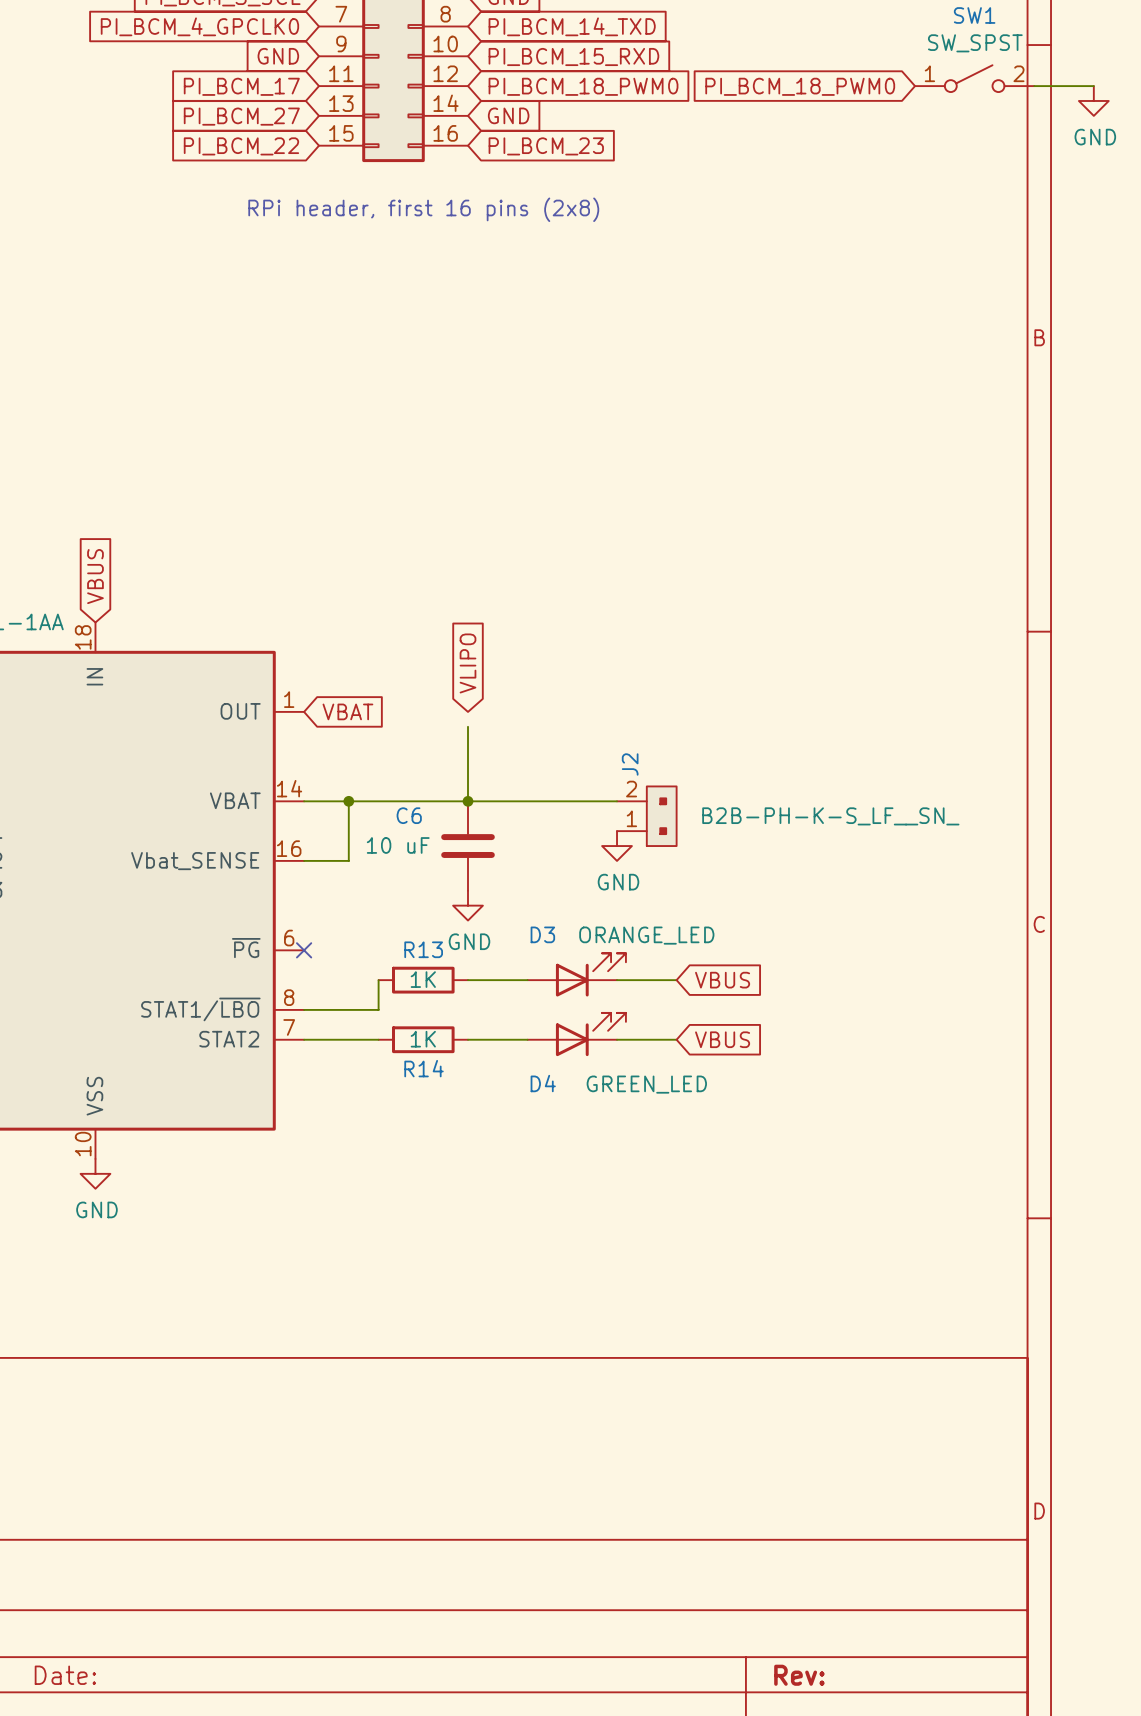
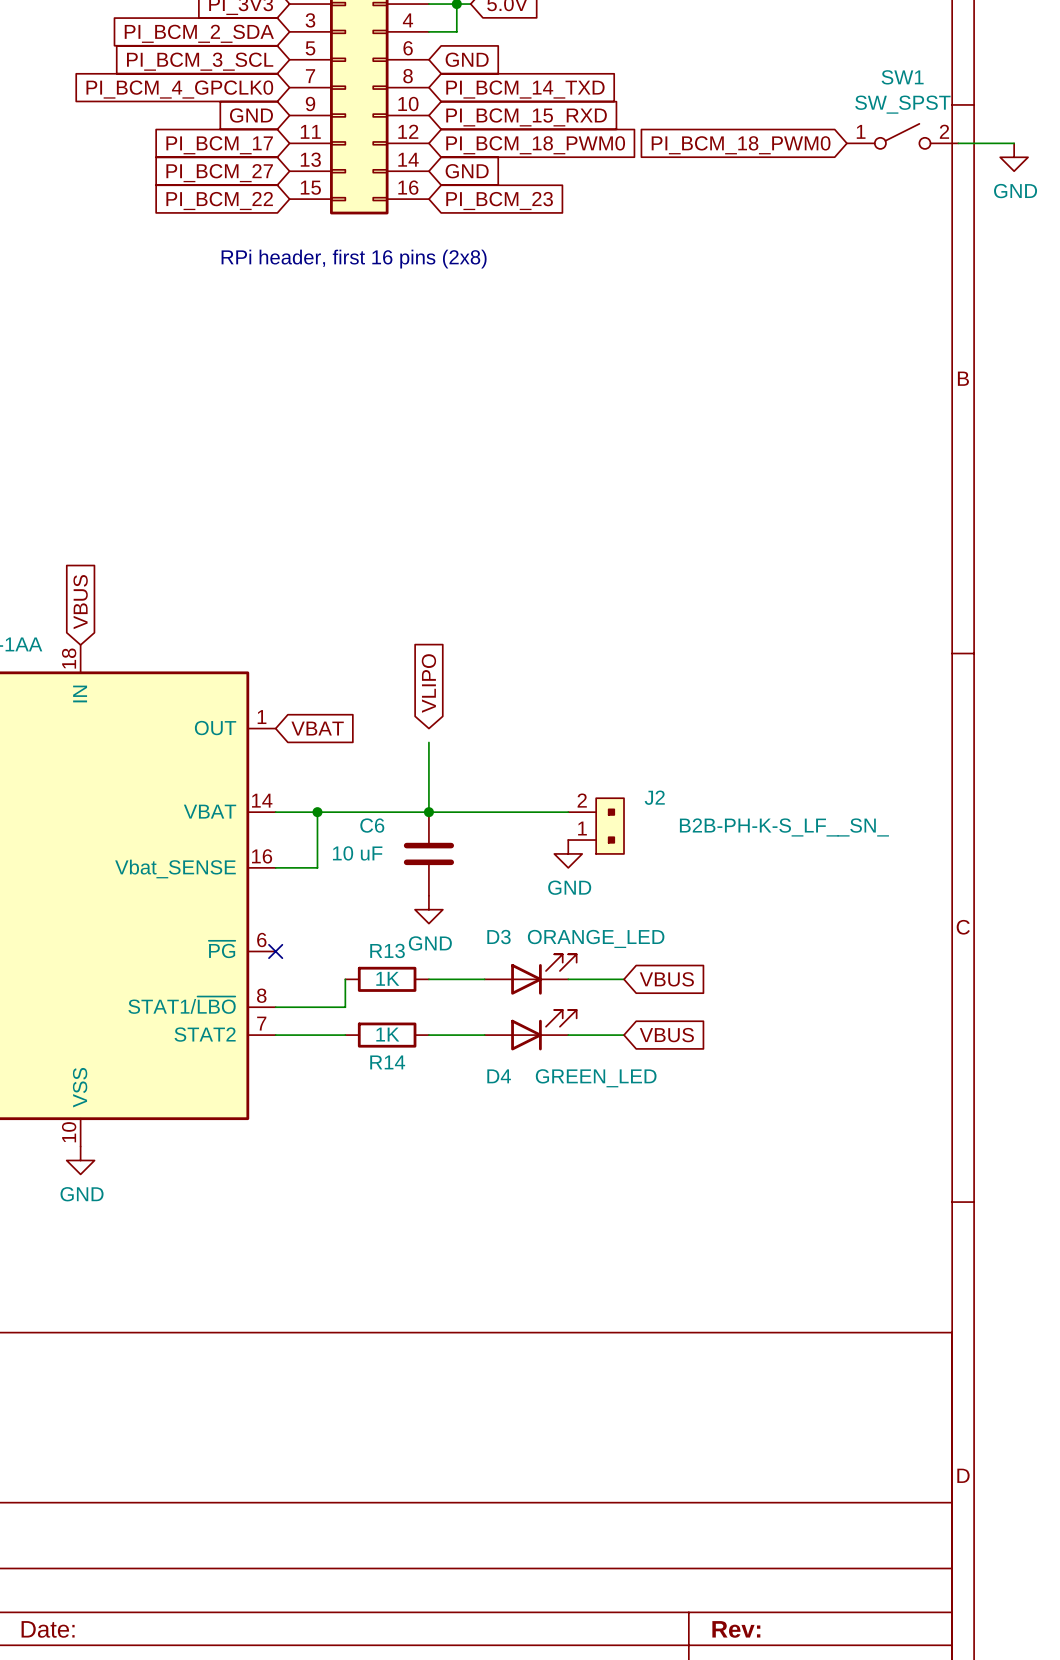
J2 name rotation: 0° (630, 764) -> 90° clockwise (654, 797)
J2 name position: J2 (630, 764) -> J2 (654, 797)

